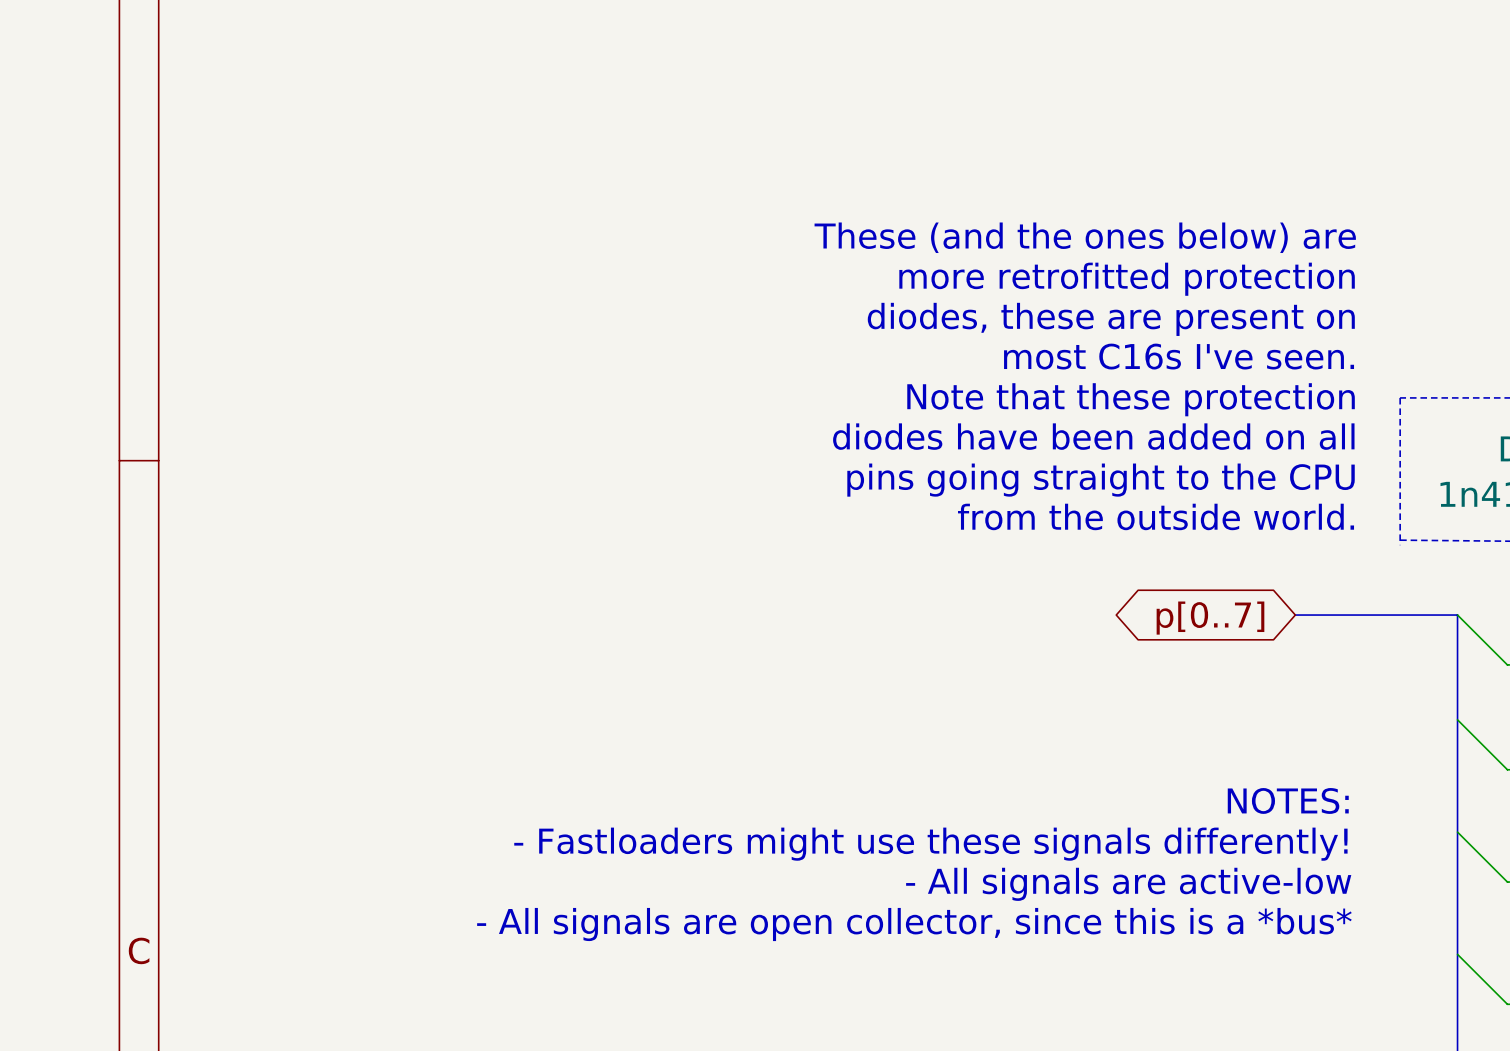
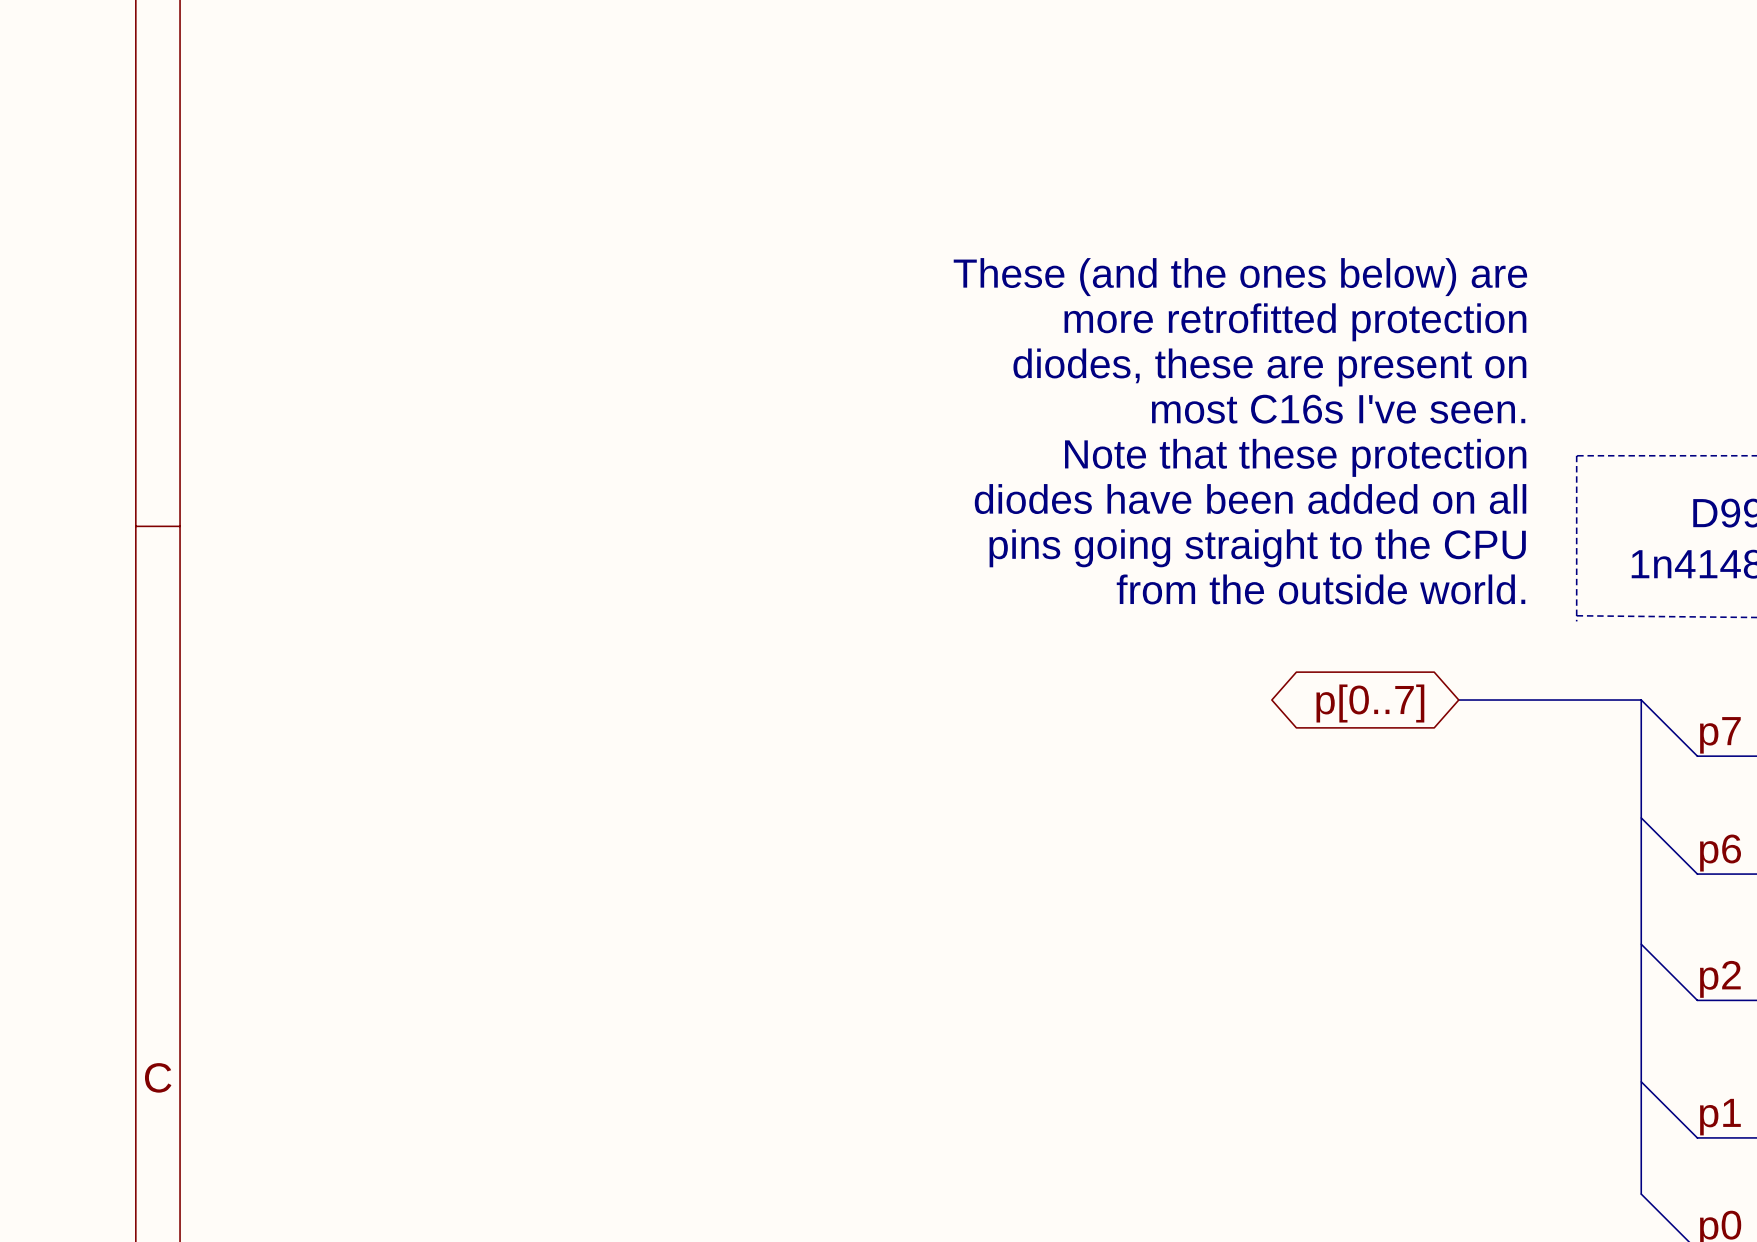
text: NOTES: (1288, 800) -> none
text: - Fastloaders might use these signals differently! (930, 844) -> none
text: - All signals are active-low (1128, 884) -> none
text: - All signals are open collector, since this is a *bus* (914, 924) -> none

